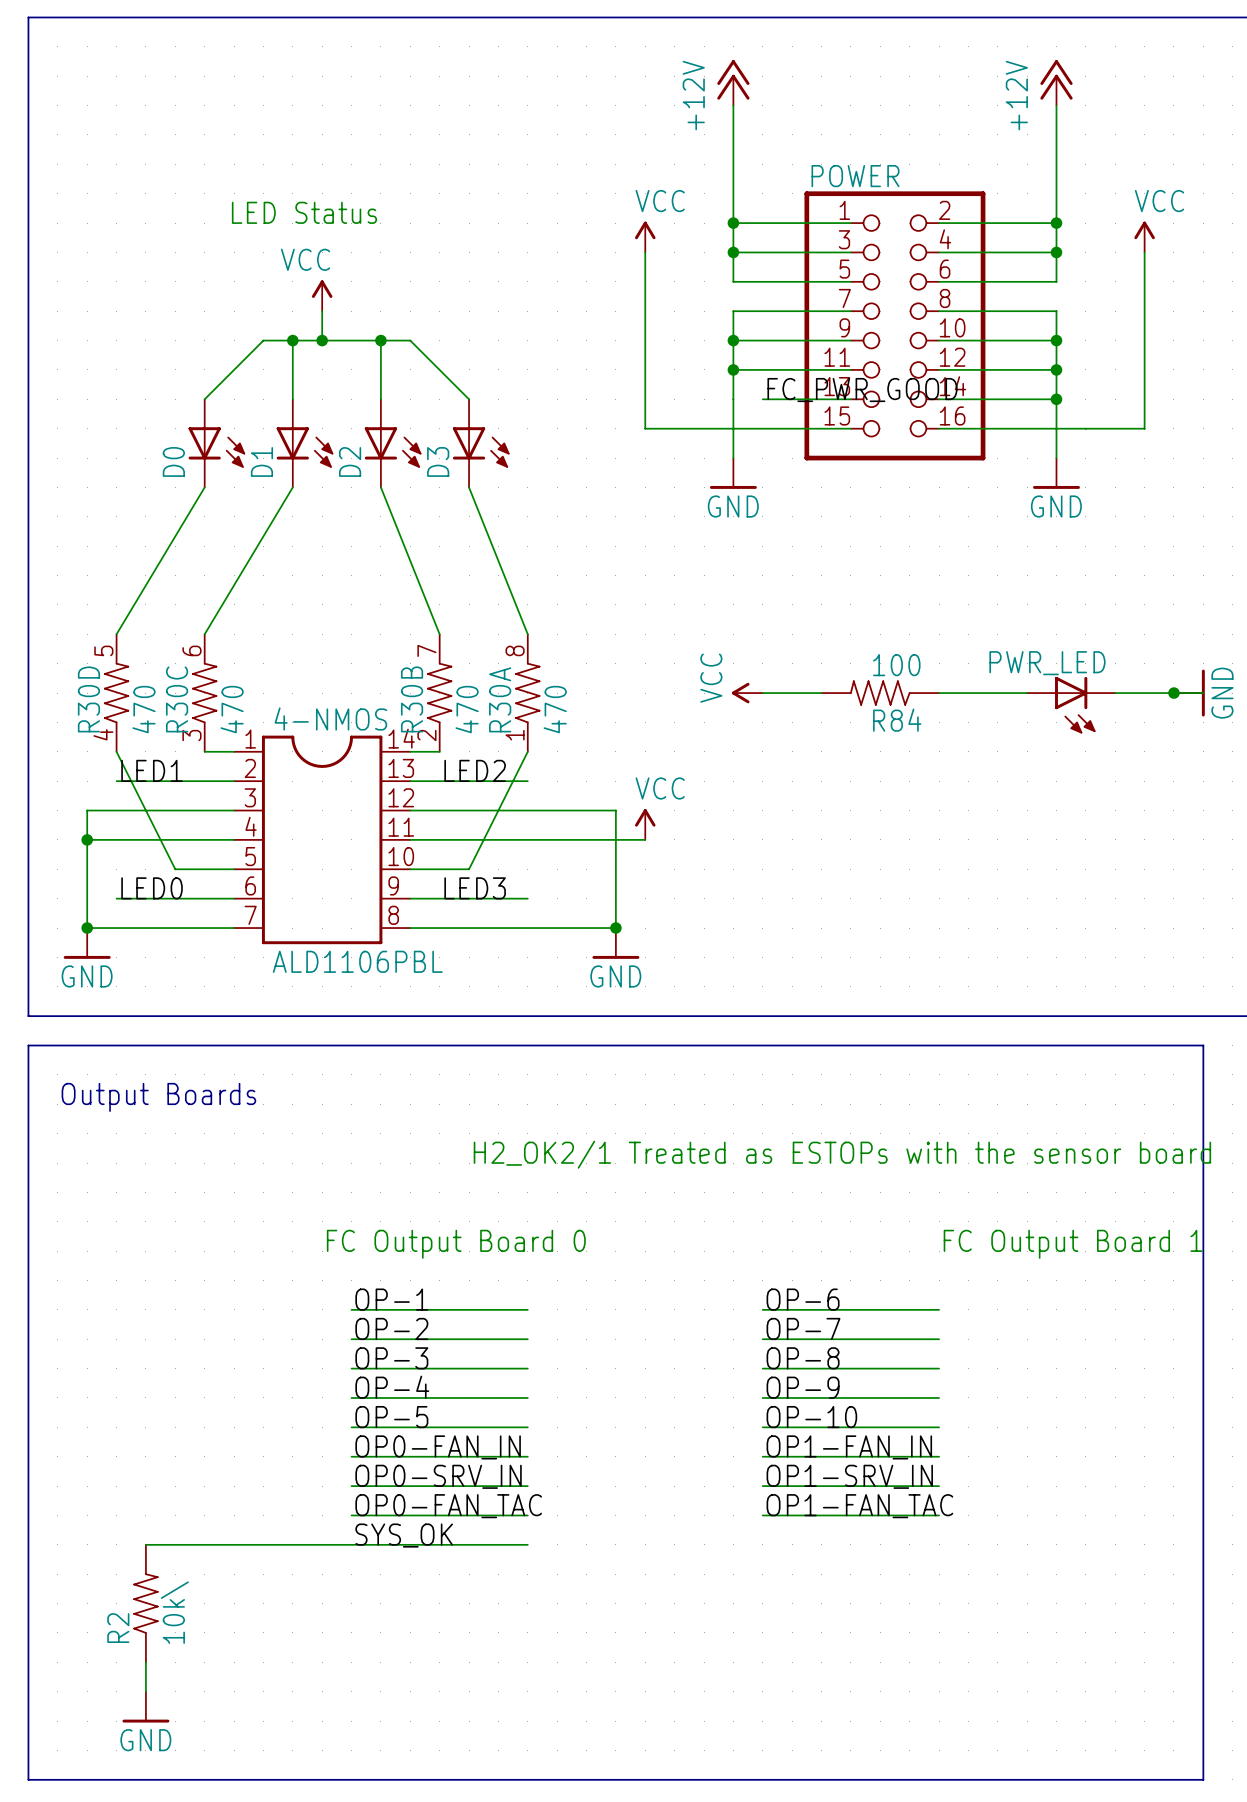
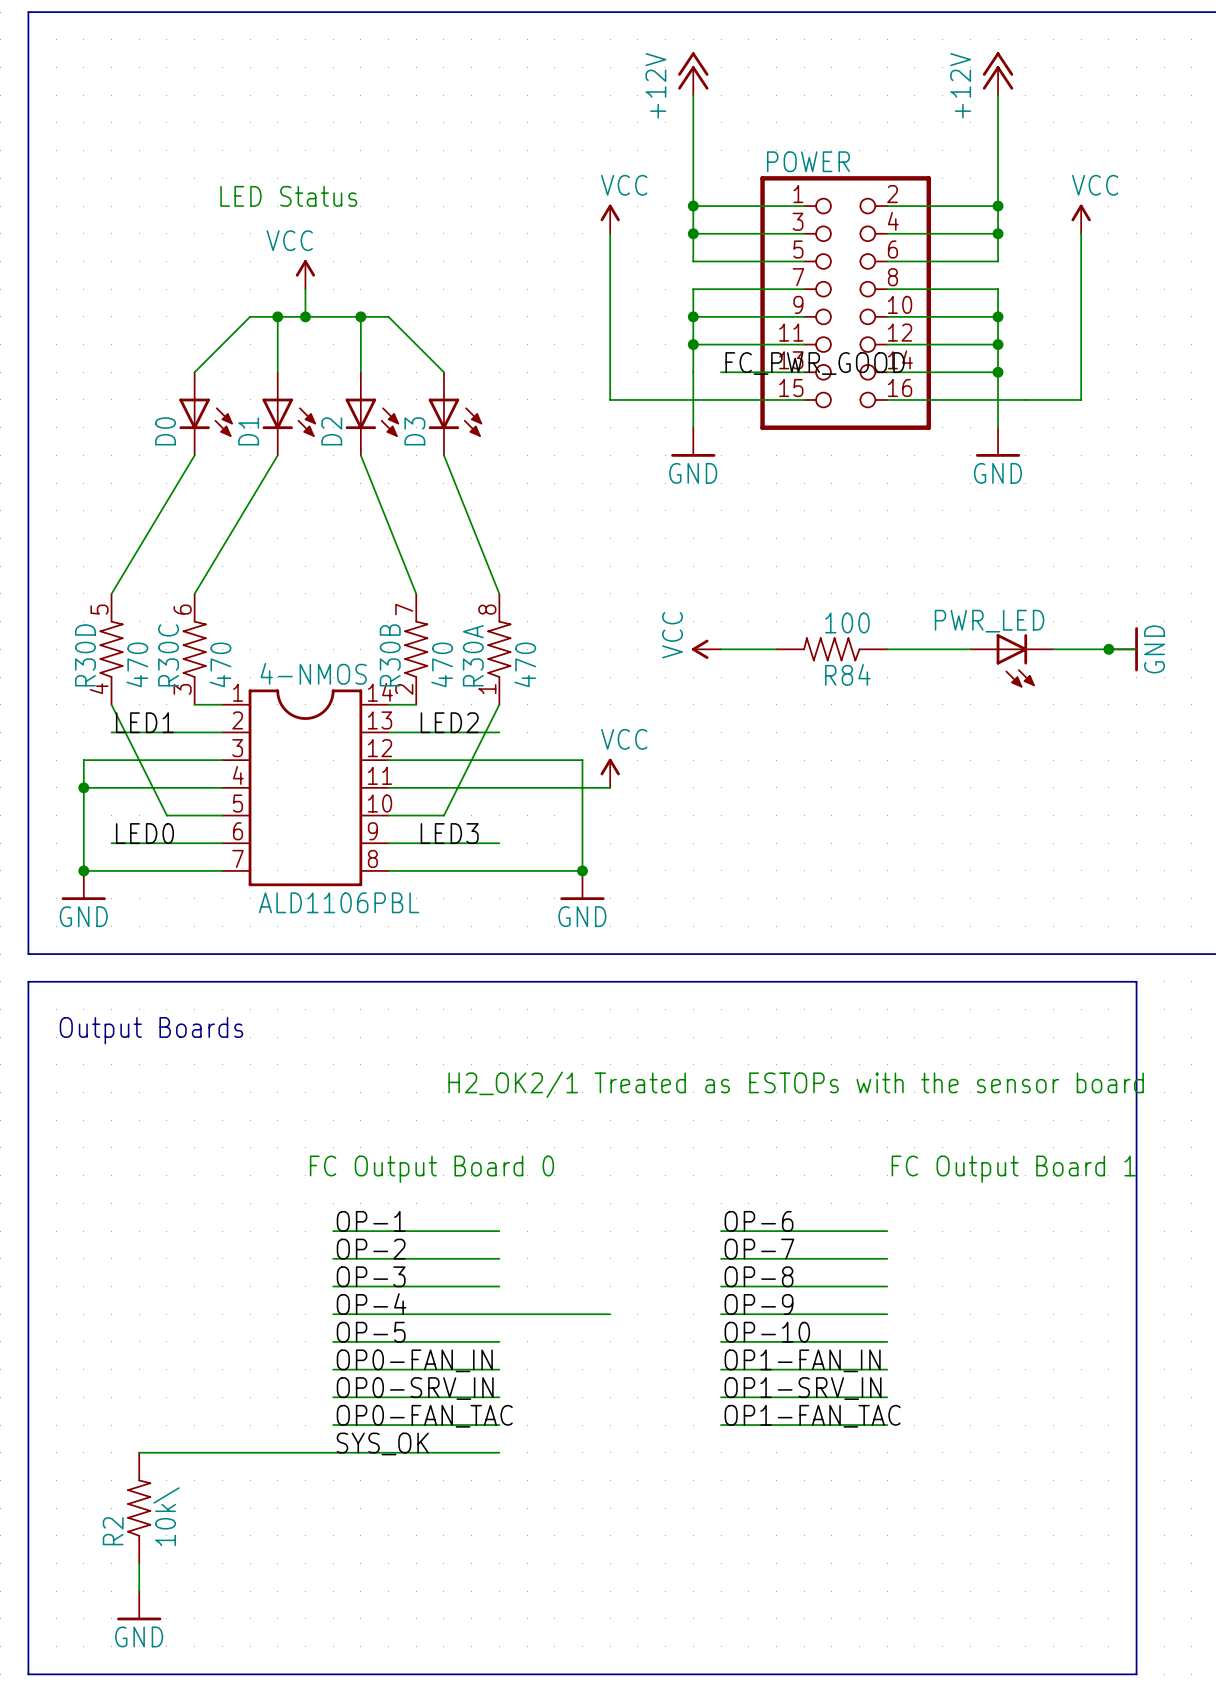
wire: none -> (499, 1314) (610, 1314)

